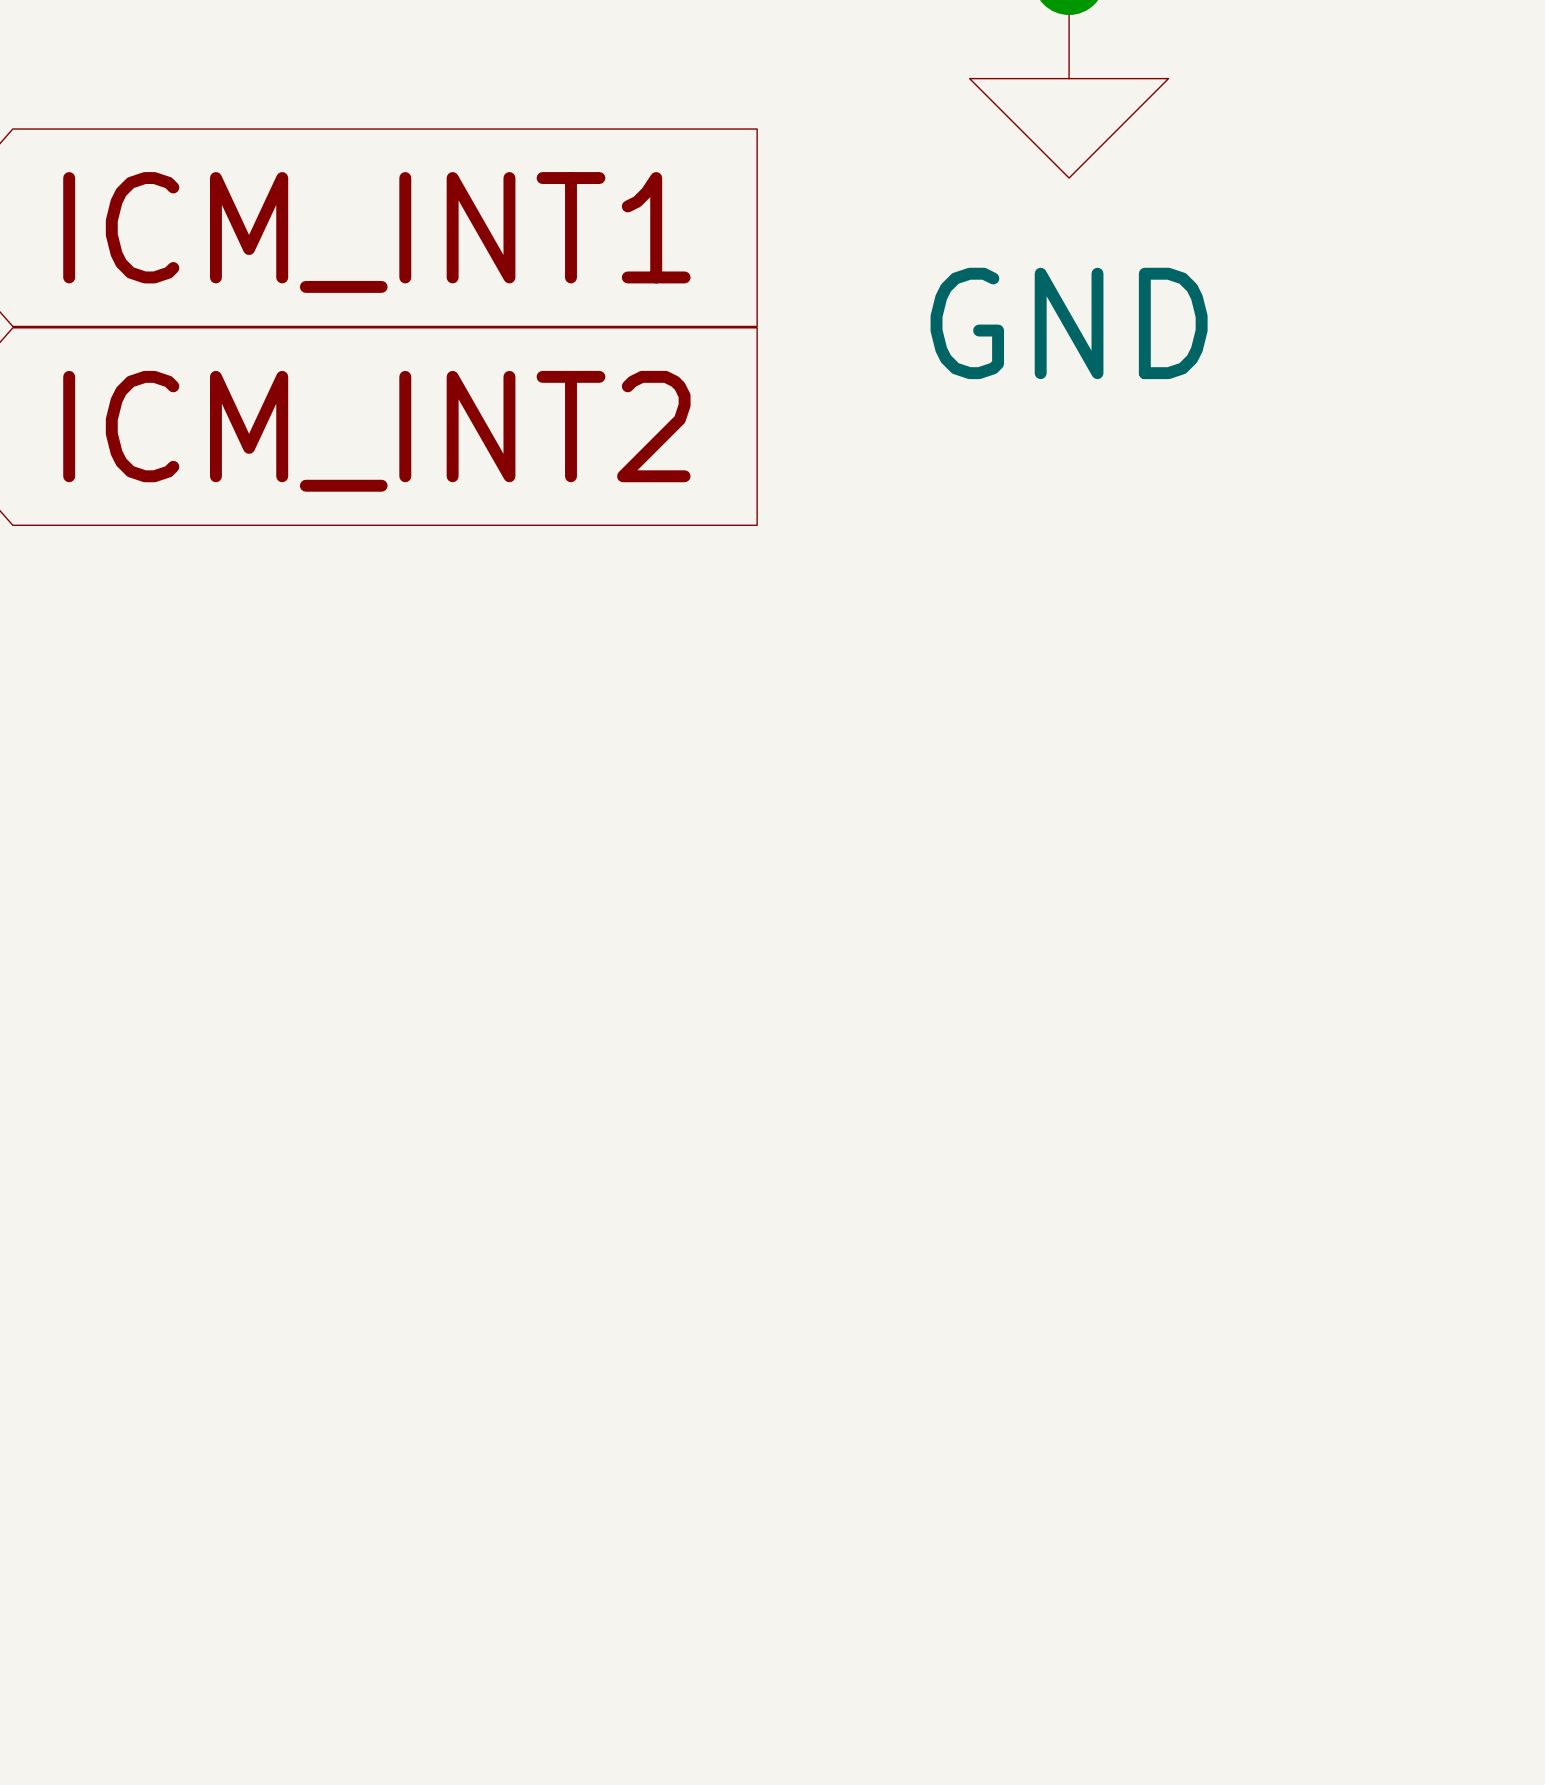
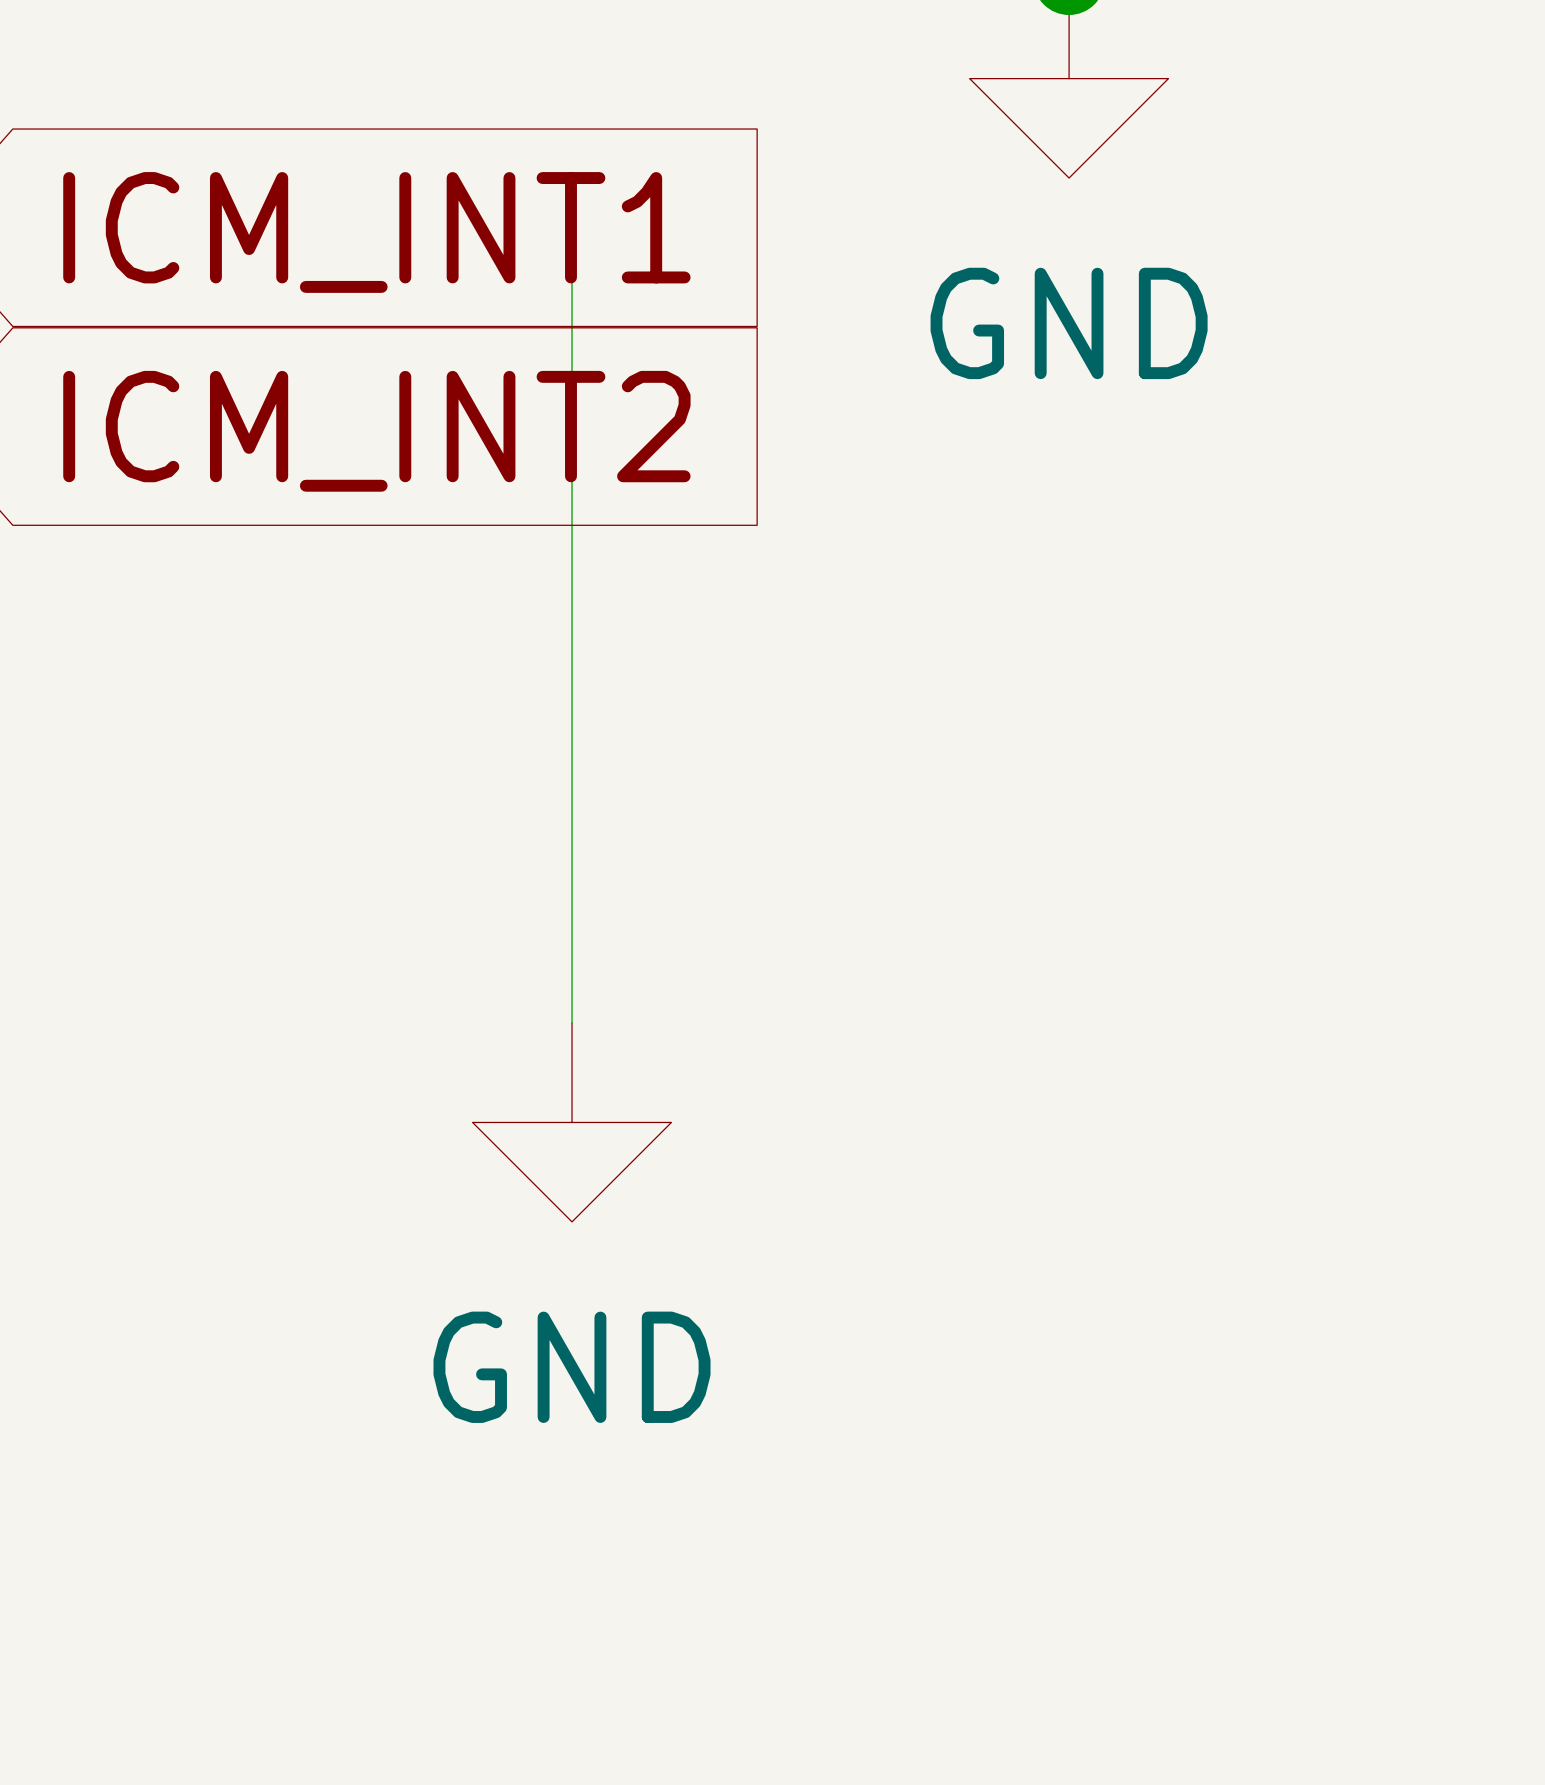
wire: none -> (572, 277) (572, 1023)
power symbol: none -> GND (572, 1122)

